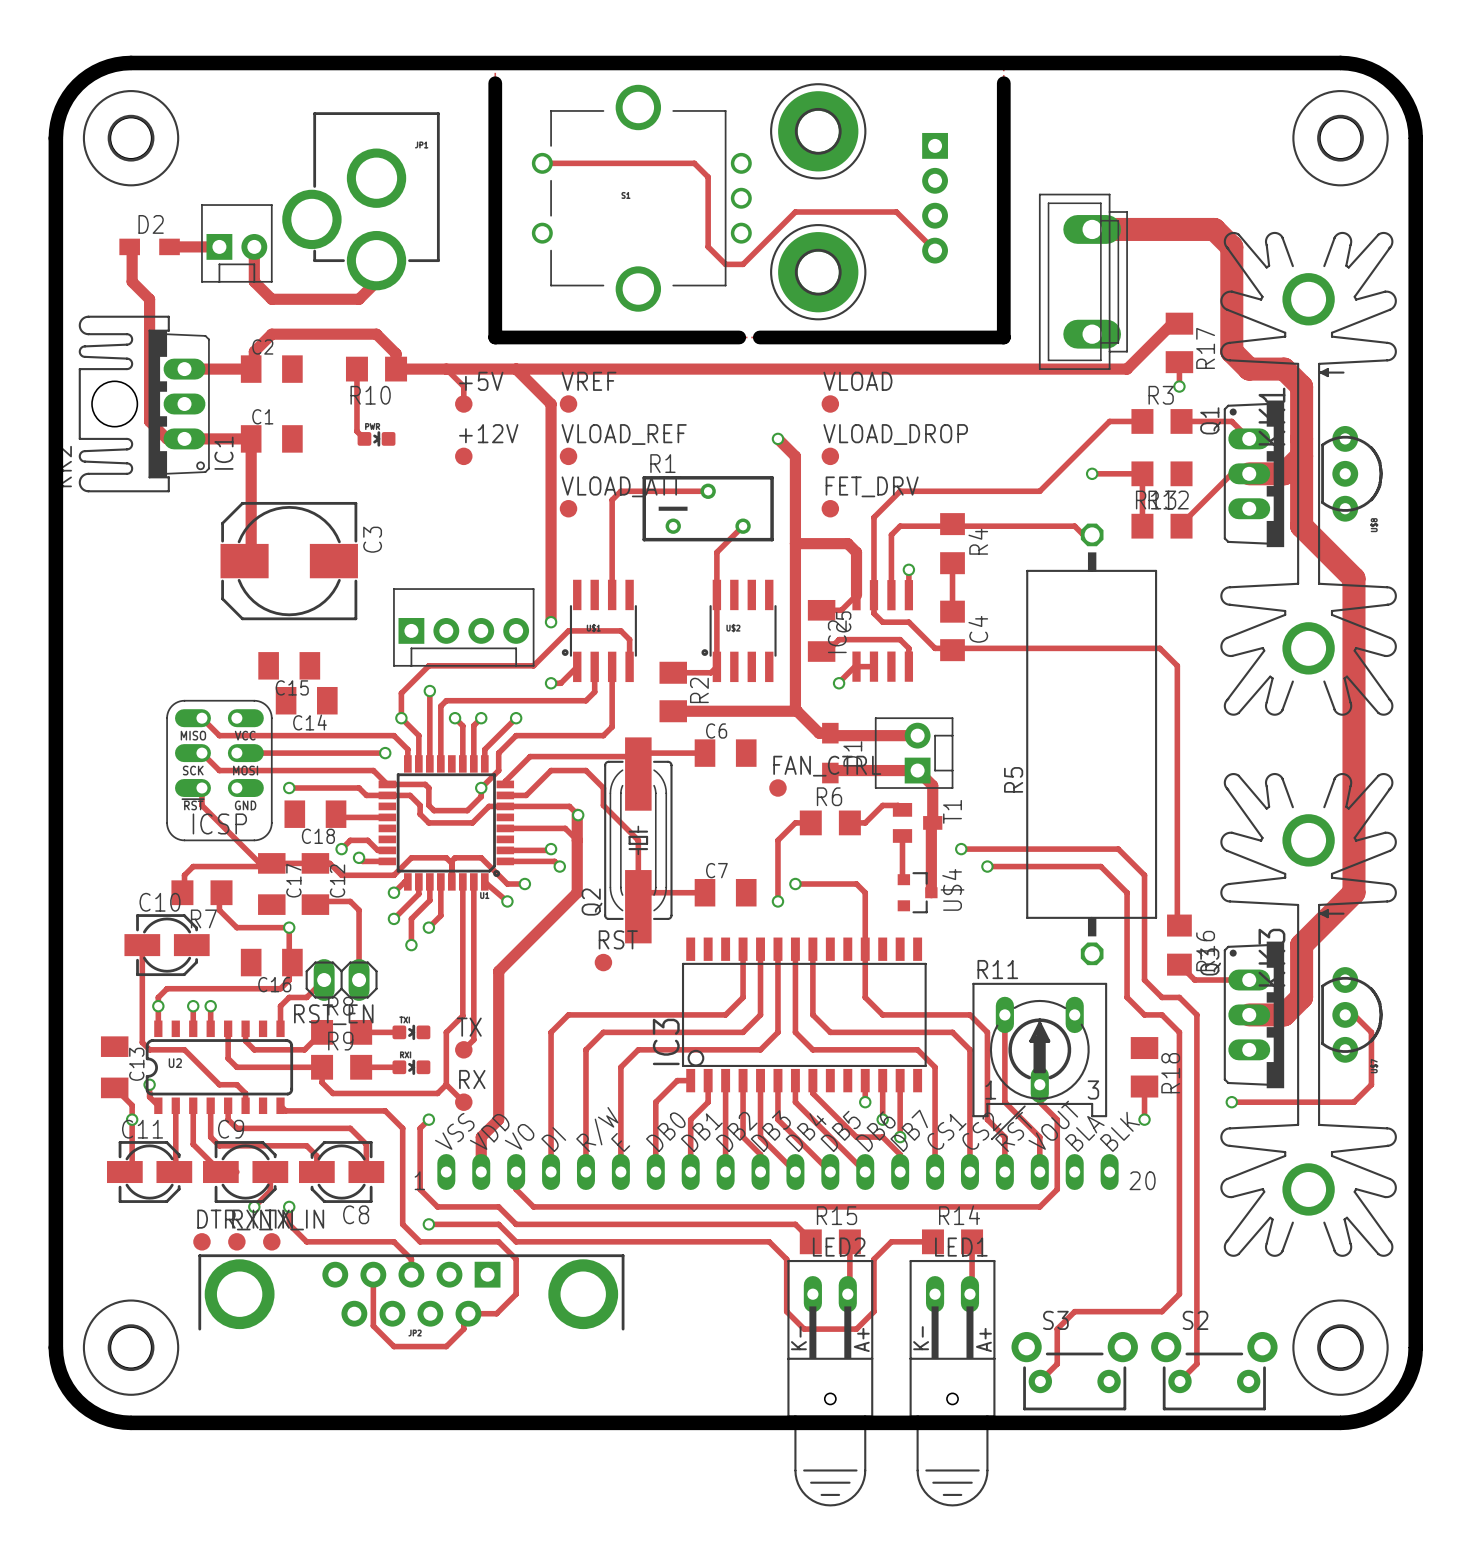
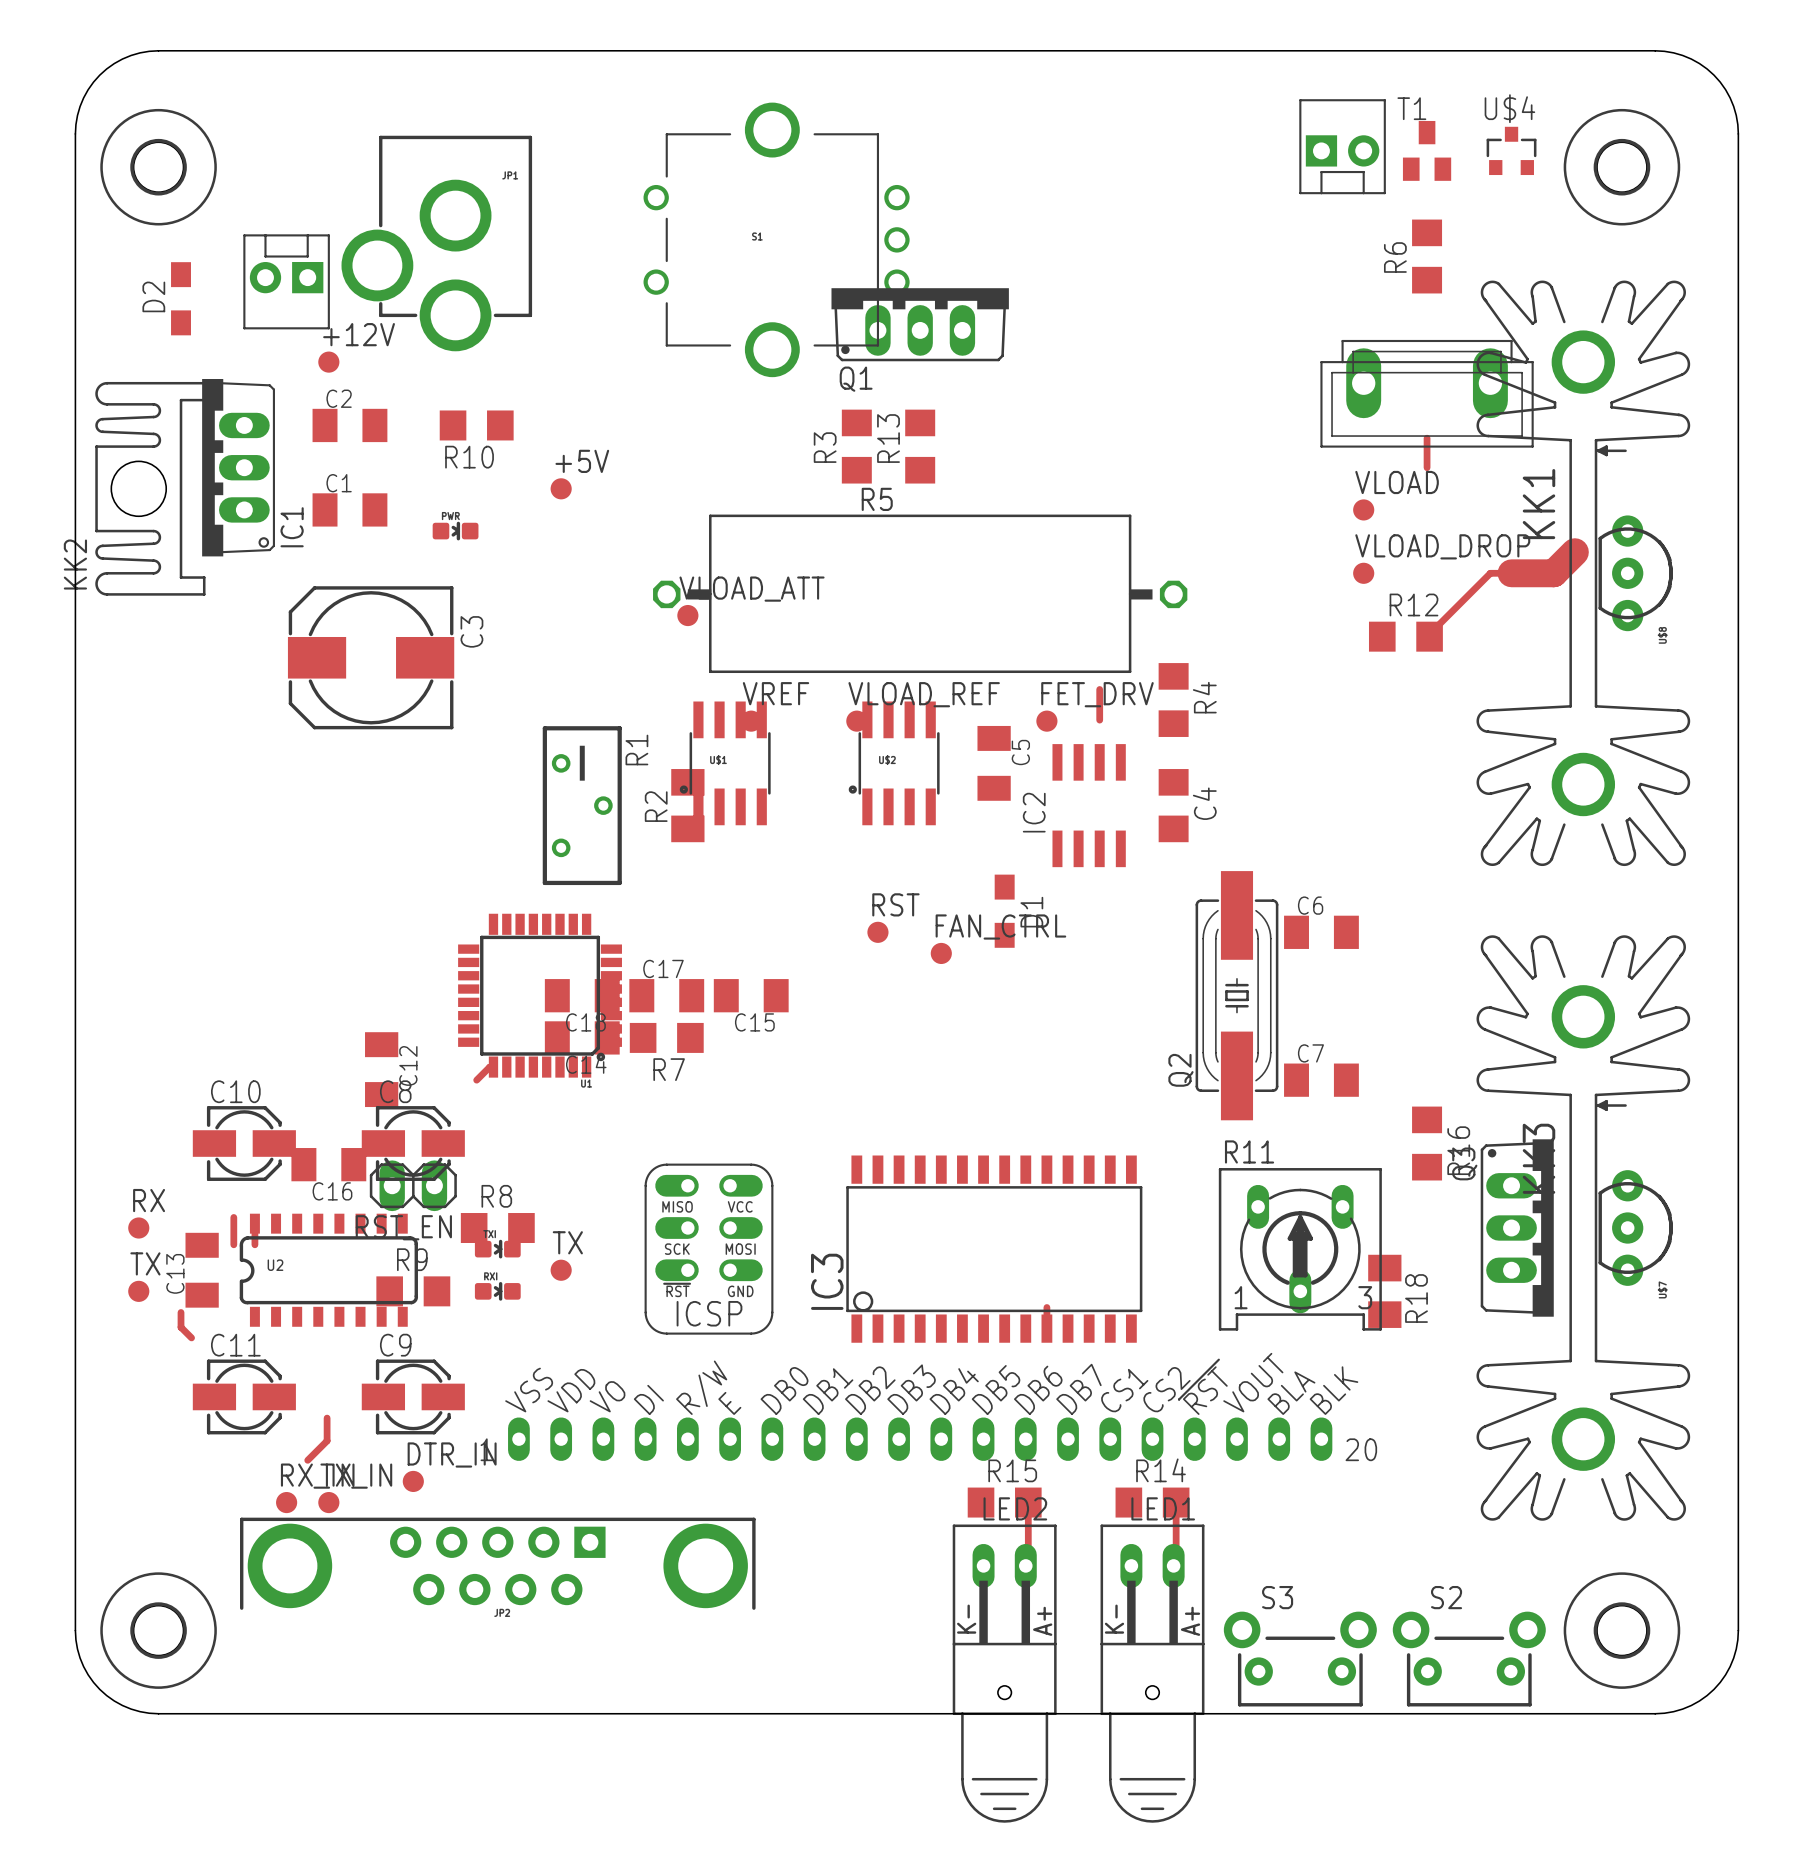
board edge: (131, 62) (1340, 62) (1369, 68) (1393, 84) (1410, 109) (1416, 138) (1416, 1347) (1410, 1376) (1393, 1401) (1369, 1417) (1340, 1423) (131, 1423) (102, 1417) (77, 1401) (61, 1376) (55, 1347) (55, 138) (61, 109) (77, 84) (102, 68) (131, 62) -> none
board edge: (495, 83) (495, 337) (739, 337) -> none
board edge: (1003, 83) (1003, 337) (759, 337) -> none
part: none -> (1342, 146)
part: (818, 131) -> none
board edge: (62, 138) (66, 115) (72, 101) (82, 89) (94, 80) (108, 73) (131, 69) (1340, 69) (1363, 73) (1377, 80) (1389, 89) (1398, 101) (1405, 115) (1409, 138) (1409, 1347) (1405, 1370) (1398, 1384) (1389, 1396) (1377, 1405) (1363, 1412) (1340, 1416) -> (75, 167) (75, 124) (80, 106) (88, 89) (99, 75) (114, 63) (131, 55) (149, 51) (1655, 50) (1682, 55) (1699, 63) (1714, 75) (1725, 89) (1733, 106) (1738, 133) (1737, 1639) (1733, 1658) (1725, 1674) (1714, 1689) (1699, 1701) (1682, 1709) (1664, 1713) (1621, 1713)
track: (542, 163) (694, 163) (708, 177) (708, 246) (725, 264) (743, 264) (795, 212) (896, 212) (935, 250) -> none
part: (935, 198) -> none
D2 name position: D2 (151, 224) -> D2 (153, 296)
track: (1092, 229) (1214, 229) (1231, 246) (1231, 351) (1249, 369) (1284, 369) (1301, 386) (1301, 526) (1353, 578) (1353, 892) (1301, 945) (1301, 997) (1284, 1014) (1249, 1014) -> none
part rotation: 0° (236, 243) -> 180° (286, 281)
track: (129, 246) (132, 249) (132, 281) (149, 299) (149, 421) (167, 438) (251, 438) (251, 554) (244, 561) -> none
D2 rotation: 0° (149, 246) -> 90° clockwise (181, 298)
track: (169, 246) (219, 246) -> none
track: (254, 246) (254, 281) (271, 299) (359, 299) (376, 281) (376, 260) -> none
part: (818, 272) -> none
part rotation: 0° (1083, 281) -> 90° counterclockwise (1427, 393)
track: (1179, 323) (1172, 323) (1127, 369) (396, 369) (396, 353) (376, 334) (271, 334) (254, 351) (254, 365) (251, 369) (184, 369) -> none
R17: (1179, 342) -> none
C2 position: (271, 369) -> (349, 425)
track: (356, 369) (356, 431) (364, 438) -> none
R10 position: (376, 369) -> (476, 425)
track: (446, 369) (463, 386) (463, 404) -> none
track: (516, 369) (551, 404) (551, 622) -> none
via: (1179, 386) -> none
R3 name position: R3 (1161, 395) -> R3 (825, 447)
IC1 position: (179, 404) -> (238, 467)
VREF position: (568, 404) -> (751, 721)
VLOAD position: (830, 404) -> (1363, 509)
track: (1142, 421) (1109, 421) (1039, 491) (900, 491) (873, 517) (873, 613) (882, 622) (908, 622) (935, 648) (950, 648) (952, 650) (954, 648) (1159, 648) (1177, 665) (1177, 923) (1179, 925) -> none
R3 rotation: 0° (1161, 421) -> 90° clockwise (856, 446)
R3 position: (1161, 421) -> (856, 446)
track: (1181, 421) (1231, 421) (1249, 438) -> none
C1 position: (271, 438) -> (349, 509)
track: (777, 438) (795, 456) (795, 709) (819, 733) (830, 733) (832, 735) (917, 735) -> none
via: (777, 438) -> none
+12V position: (463, 456) -> (328, 362)
VLOAD_REF position: (568, 456) -> (856, 721)
VLOAD_DROP position: (830, 456) -> (1363, 573)
track: (1092, 473) (1142, 473) (1142, 526) -> none
via: (1092, 473) -> none
R13 rotation: 0° (1161, 473) -> 90° clockwise (920, 446)
R13 position: (1161, 473) -> (920, 446)
Q1 rotation: 0° (1253, 473) -> 90° counterclockwise (920, 324)
Q1 position: (1253, 473) -> (920, 324)
track: (708, 491) (620, 491) (612, 500) (612, 594) -> none
R1 rotation: 0° (708, 508) -> 90° clockwise (582, 805)
R1 position: (708, 508) -> (582, 805)
FET_DRV position: (830, 508) -> (1046, 721)
track: (743, 526) (716, 552) (716, 666) (710, 672) (673, 672) -> none
track: (1092, 534) (1083, 534) (1074, 526) (900, 526) (891, 534) (891, 595) -> none
track: (795, 543) (847, 543) (856, 552) (856, 595) (841, 610) (821, 610) -> none
R4 position: (952, 543) -> (1173, 700)
C3 position: (289, 561) -> (371, 657)
track: (952, 563) (952, 611) -> none
via: (908, 569) -> none
via: (551, 622) -> none
part: (463, 627) -> none
IC2 position: (882, 630) -> (1089, 805)
C4 position: (952, 630) -> (1173, 805)
track: (821, 651) (816, 648) (830, 648) (839, 639) (900, 639) (908, 648) (908, 666) -> none
C15 position: (289, 665) -> (751, 995)
track: (577, 666) (560, 683) (551, 683) -> none
track: (594, 666) (594, 692) (585, 700) (446, 700) (440, 706) (440, 763) -> none
track: (612, 666) (612, 726) (603, 735) (516, 735) (498, 753) (498, 770) (481, 788) (481, 796) (467, 810) (434, 810) (428, 805) (428, 788) (425, 784) (387, 784) (373, 770) (219, 770) (201, 753) -> none
track: (629, 666) (629, 639) (620, 630) (568, 630) (533, 665) (428, 665) (401, 693) (401, 718) (418, 735) (418, 763) -> none
track: (873, 666) (855, 665) (839, 683) -> none
via: (551, 683) -> none
via: (839, 683) -> none
R2 name position: R2 (699, 690) -> R2 (656, 806)
track: (429, 691) (429, 763) -> none
via: (429, 691) -> none
R2 position: (673, 692) -> (687, 805)
C14 position: (306, 700) -> (582, 1037)
track: (673, 711) (797, 711) -> none
track: (201, 718) (219, 735) (393, 735) (407, 749) (407, 763) -> none
via: (401, 718) -> none
track: (455, 718) (462, 725) (462, 763) -> none
via: (455, 718) -> none
track: (481, 718) (473, 725) (473, 763) -> none
via: (481, 718) -> none
track: (516, 718) (484, 749) (484, 763) -> none
via: (516, 718) -> none
R5 rotation: 0° (1091, 744) -> 90° clockwise (920, 593)
R5 position: (1091, 744) -> (920, 593)
track: (236, 753) (385, 753) -> none
via: (385, 753) -> none
track: (641, 753) (704, 753) -> none
track: (641, 753) (638, 756) (530, 756) (505, 781) (505, 784) -> none
C6 position: (725, 753) -> (1321, 932)
part: (914, 753) -> none
part: (219, 770) -> none
track: (830, 773) (832, 770) (917, 770) (932, 785) (931, 892) -> none
track: (201, 788) (201, 805) (263, 866) -> none
track: (289, 788) (359, 788) (366, 795) (410, 795) (420, 805) (420, 814) (428, 822) (472, 822) (489, 806) (569, 806) (578, 815) -> none
via: (289, 788) -> none
via: (481, 788) -> none
track: (505, 795) (526, 795) (551, 770) (585, 770) (603, 788) (603, 805) (638, 840) (638, 906) (641, 892) (704, 892) -> none
R6 name position: R6 (829, 796) -> R6 (1395, 257)
track: (902, 809) (898, 805) (882, 805) (865, 822) (849, 822) -> none
C18 position: (315, 814) -> (582, 995)
track: (336, 814) (339, 817) (387, 817) -> none
track: (577, 814) (577, 892) (498, 971) (498, 1119) (481, 1137) (481, 1172) -> none
via: (578, 815) -> none
track: (810, 822) (795, 822) (777, 840) (777, 901) -> none
R6 rotation: 0° (830, 822) -> 90° clockwise (1427, 256)
R6 position: (830, 822) -> (1427, 256)
T1 rotation: 0° (917, 822) -> 90° counterclockwise (1427, 150)
T1 position: (917, 822) -> (1427, 150)
track: (505, 828) (565, 828) (577, 840) -> none
track: (902, 835) (903, 879) -> none
Q2 position: (638, 840) -> (1236, 995)
track: (341, 849) (350, 840) (367, 840) (377, 850) (387, 850) -> none
via: (341, 849) -> none
track: (551, 849) (505, 850) -> none
via: (551, 849) -> none
track: (961, 849) (1118, 849) (1144, 875) (1144, 980) (1161, 997) (1179, 997) (1196, 1014) (1196, 1364) (1179, 1381) -> none
via: (961, 849) -> none
track: (359, 857) (362, 861) (387, 861) -> none
via: (359, 857) -> none
track: (505, 861) (554, 861) (559, 866) -> none
track: (451, 863) (446, 857) (411, 857) (393, 875) (341, 875) (329, 863) (271, 863) -> none
track: (277, 866) (193, 866) (184, 875) (184, 890) (182, 892) -> none
via: (559, 866) -> none
track: (987, 866) (1100, 866) (1127, 892) (1127, 997) (1144, 1014) (1161, 1014) (1179, 1032) (1179, 1294) (1161, 1311) (1074, 1311) (1057, 1329) (1057, 1364) (1040, 1381) -> none
via: (987, 866) -> none
C17 name position: C17 (293, 880) -> C17 (663, 968)
track: (418, 881) (418, 894) (393, 918) -> none
track: (429, 881) (429, 900) (411, 918) (411, 945) -> none
track: (440, 881) (440, 915) (428, 927) -> none
track: (451, 881) (451, 861) (455, 857) (481, 857) (507, 884) (524, 884) -> none
track: (462, 881) (462, 1015) (446, 1032) (446, 1084) -> none
track: (473, 881) (473, 1039) (463, 1049) -> none
track: (484, 881) (507, 901) -> none
C17 rotation: 0° (271, 884) -> 90° clockwise (666, 995)
C17 position: (271, 884) -> (666, 995)
via: (524, 884) -> none
track: (795, 884) (856, 884) (865, 892) (865, 997) (882, 1014) (969, 1014) (987, 1032) (987, 1119) (1004, 1137) (1004, 1172) -> none
via: (795, 884) -> none
R7 position: (201, 892) -> (666, 1037)
track: (221, 892) (219, 894) (219, 910) (236, 927) (289, 927) (289, 962) (292, 962) (289, 965) (289, 980) (280, 988) (167, 988) (158, 997) (158, 1028) -> none
via: (393, 892) -> none
C7 position: (725, 892) -> (1321, 1080)
U$4 rotation: 0° (917, 892) -> 90° counterclockwise (1511, 150)
U$4 position: (917, 892) -> (1511, 150)
via: (507, 901) -> none
via: (777, 901) -> none
track: (315, 904) (318, 901) (350, 901) (359, 910) (359, 980) -> none
via: (393, 918) -> none
via: (289, 927) -> none
via: (428, 927) -> none
track: (142, 945) (142, 1042) (149, 1049) (184, 1049) (219, 1084) (236, 1084) (245, 1093) (245, 1105) -> none
C10 position: (167, 945) -> (244, 1143)
via: (411, 945) -> none
track: (743, 949) (743, 997) (725, 1014) (568, 1014) (551, 1032) (551, 1172) -> none
track: (760, 949) (760, 1014) (743, 1032) (603, 1032) (585, 1049) (585, 1172) -> none
track: (777, 949) (777, 1032) (760, 1049) (638, 1049) (620, 1067) (620, 1172) -> none
track: (795, 949) (795, 1032) (812, 1049) (917, 1049) (935, 1067) (935, 1172) -> none
track: (812, 949) (812, 1014) (830, 1032) (952, 1032) (969, 1049) (969, 1172) -> none
RST position: (603, 962) -> (877, 932)
track: (1179, 964) (1194, 980) (1249, 980) -> none
track: (324, 980) (306, 997) (289, 997) (280, 1006) (280, 1028) -> none
via: (158, 1006) -> none
via: (193, 1006) -> none
via: (210, 1006) -> none
RX: none -> (138, 1228)
IC3 position: (804, 1014) -> (994, 1249)
track: (1004, 1014) (1004, 1102) (1039, 1137) (1039, 1172) -> none
track: (1345, 1014) (1353, 1014) (1371, 1032) (1371, 1084) (1353, 1102) (1231, 1102) -> none
track: (228, 1028) (228, 1058) (236, 1067) (322, 1067) (322, 1082) (332, 1093) (437, 1093) (446, 1084) -> none
track: (245, 1028) (245, 1041) (254, 1049) (304, 1049) (322, 1032) -> none
R8 position: (341, 1032) -> (497, 1228)
track: (361, 1032) (399, 1032) -> none
part: none -> (708, 1249)
R11 position: (1039, 1050) -> (1300, 1249)
C13 name position: C13 (136, 1064) -> C13 (175, 1273)
C13 position: (114, 1067) -> (202, 1270)
TX: none -> (138, 1291)
U2 position: (219, 1067) -> (328, 1270)
track: (361, 1067) (399, 1067) -> none
track: (690, 1080) (677, 1080) (655, 1102) (655, 1172) -> none
track: (708, 1080) (708, 1102) (690, 1119) (690, 1172) -> none
track: (725, 1080) (725, 1172) -> none
track: (743, 1080) (743, 1137) (760, 1154) (760, 1172) -> none
track: (760, 1080) (760, 1137) (795, 1172) -> none
track: (777, 1080) (777, 1119) (830, 1172) -> none
track: (795, 1080) (795, 1102) (865, 1172) -> none
track: (812, 1080) (812, 1093) (856, 1137) (882, 1137) (900, 1154) (900, 1172) -> none
track: (882, 1080) (882, 1119) -> none
track: (900, 1080) (900, 1137) -> none
via: (149, 1084) -> none
track: (446, 1084) (463, 1102) -> none
track: (1039, 1084) (1039, 1102) (1057, 1119) (1057, 1189) (1039, 1206) (533, 1206) (516, 1189) (516, 1172) -> none
track: (1144, 1086) (1144, 1119) -> none
track: (114, 1087) (132, 1105) (132, 1164) (124, 1172) (114, 1172) -> none
RX: (463, 1102) -> none
via: (865, 1102) -> none
via: (1231, 1102) -> none
track: (175, 1105) (175, 1163) (184, 1172) (174, 1172) -> none
track: (193, 1105) (193, 1144) (220, 1172) (236, 1172) -> none
track: (210, 1105) (210, 1137) (219, 1145) (306, 1145) (316, 1156) (316, 1172) -> none
track: (228, 1105) (228, 1119) (236, 1128) (350, 1128) (366, 1144) (366, 1172) -> none
track: (280, 1105) (285, 1110) (385, 1110) (402, 1128) (402, 1224) (420, 1241) (498, 1241) (516, 1259) (516, 1294) (496, 1313) (468, 1313) (463, 1318) (463, 1329) (446, 1346) (393, 1346) (373, 1325) (373, 1274) -> none
via: (132, 1119) -> none
track: (428, 1119) (420, 1128) (420, 1189) (437, 1206) (498, 1206) (516, 1224) (795, 1224) (810, 1241) -> none
via: (428, 1119) -> none
via: (882, 1119) -> none
via: (1144, 1119) -> none
via: (900, 1137) -> none
part position: (777, 1147) -> (920, 1409)
C11 position: (149, 1172) -> (244, 1396)
C9 position: (245, 1172) -> (413, 1396)
C8 rotation: 0° (341, 1172) -> 180° (413, 1143)
C8 position: (341, 1172) -> (413, 1143)
via: (254, 1206) -> none
track: (289, 1206) (289, 1224) (306, 1241) (393, 1241) (411, 1259) (411, 1274) -> none
via: (289, 1206) -> none
track: (428, 1224) (498, 1224) (516, 1241) (769, 1241) (786, 1259) (786, 1311) (804, 1329) (856, 1329) (873, 1311) (873, 1259) (891, 1241) (932, 1241) -> none
via: (428, 1224) -> none
DTR_IN position: (201, 1241) -> (413, 1481)

